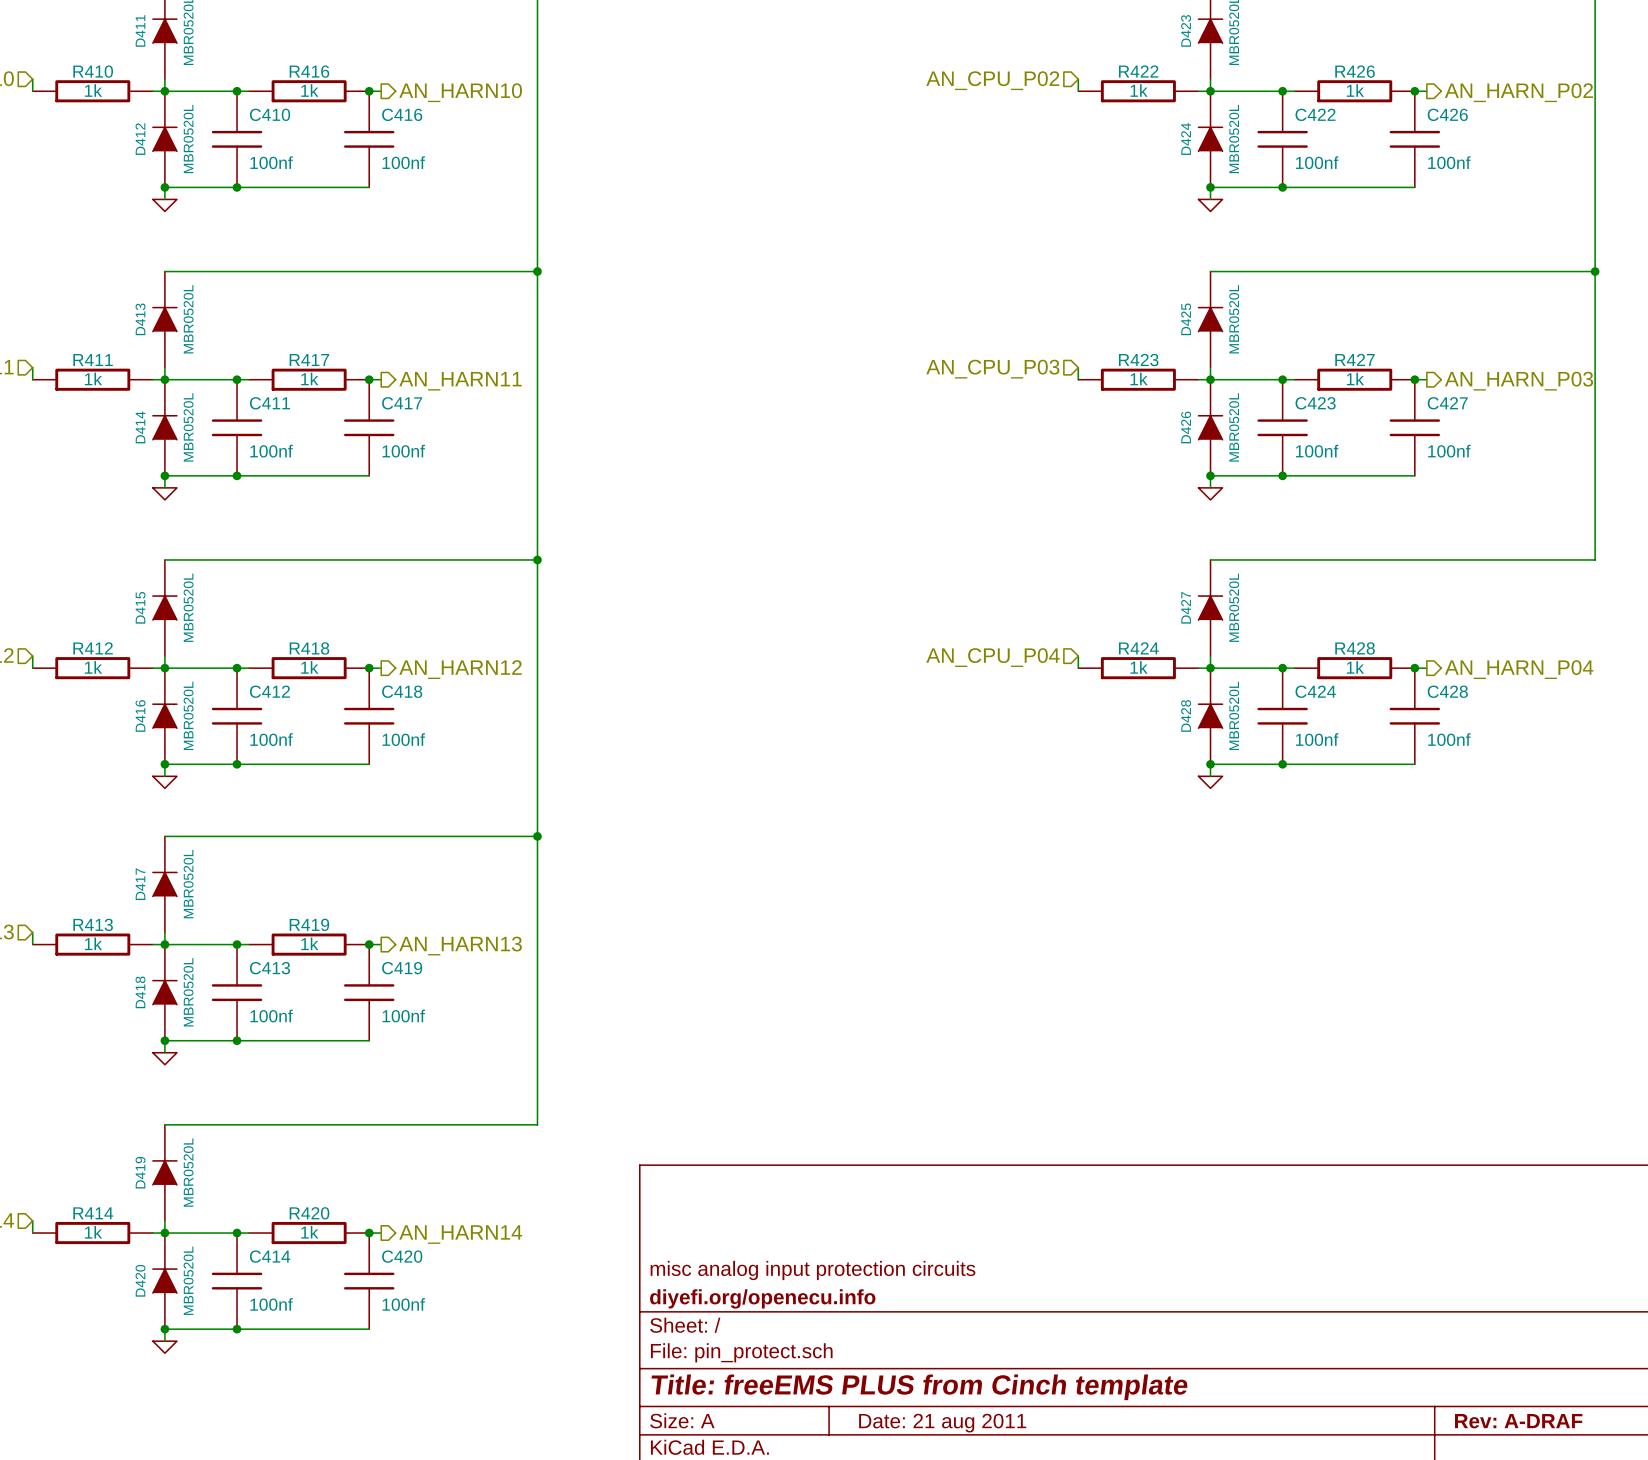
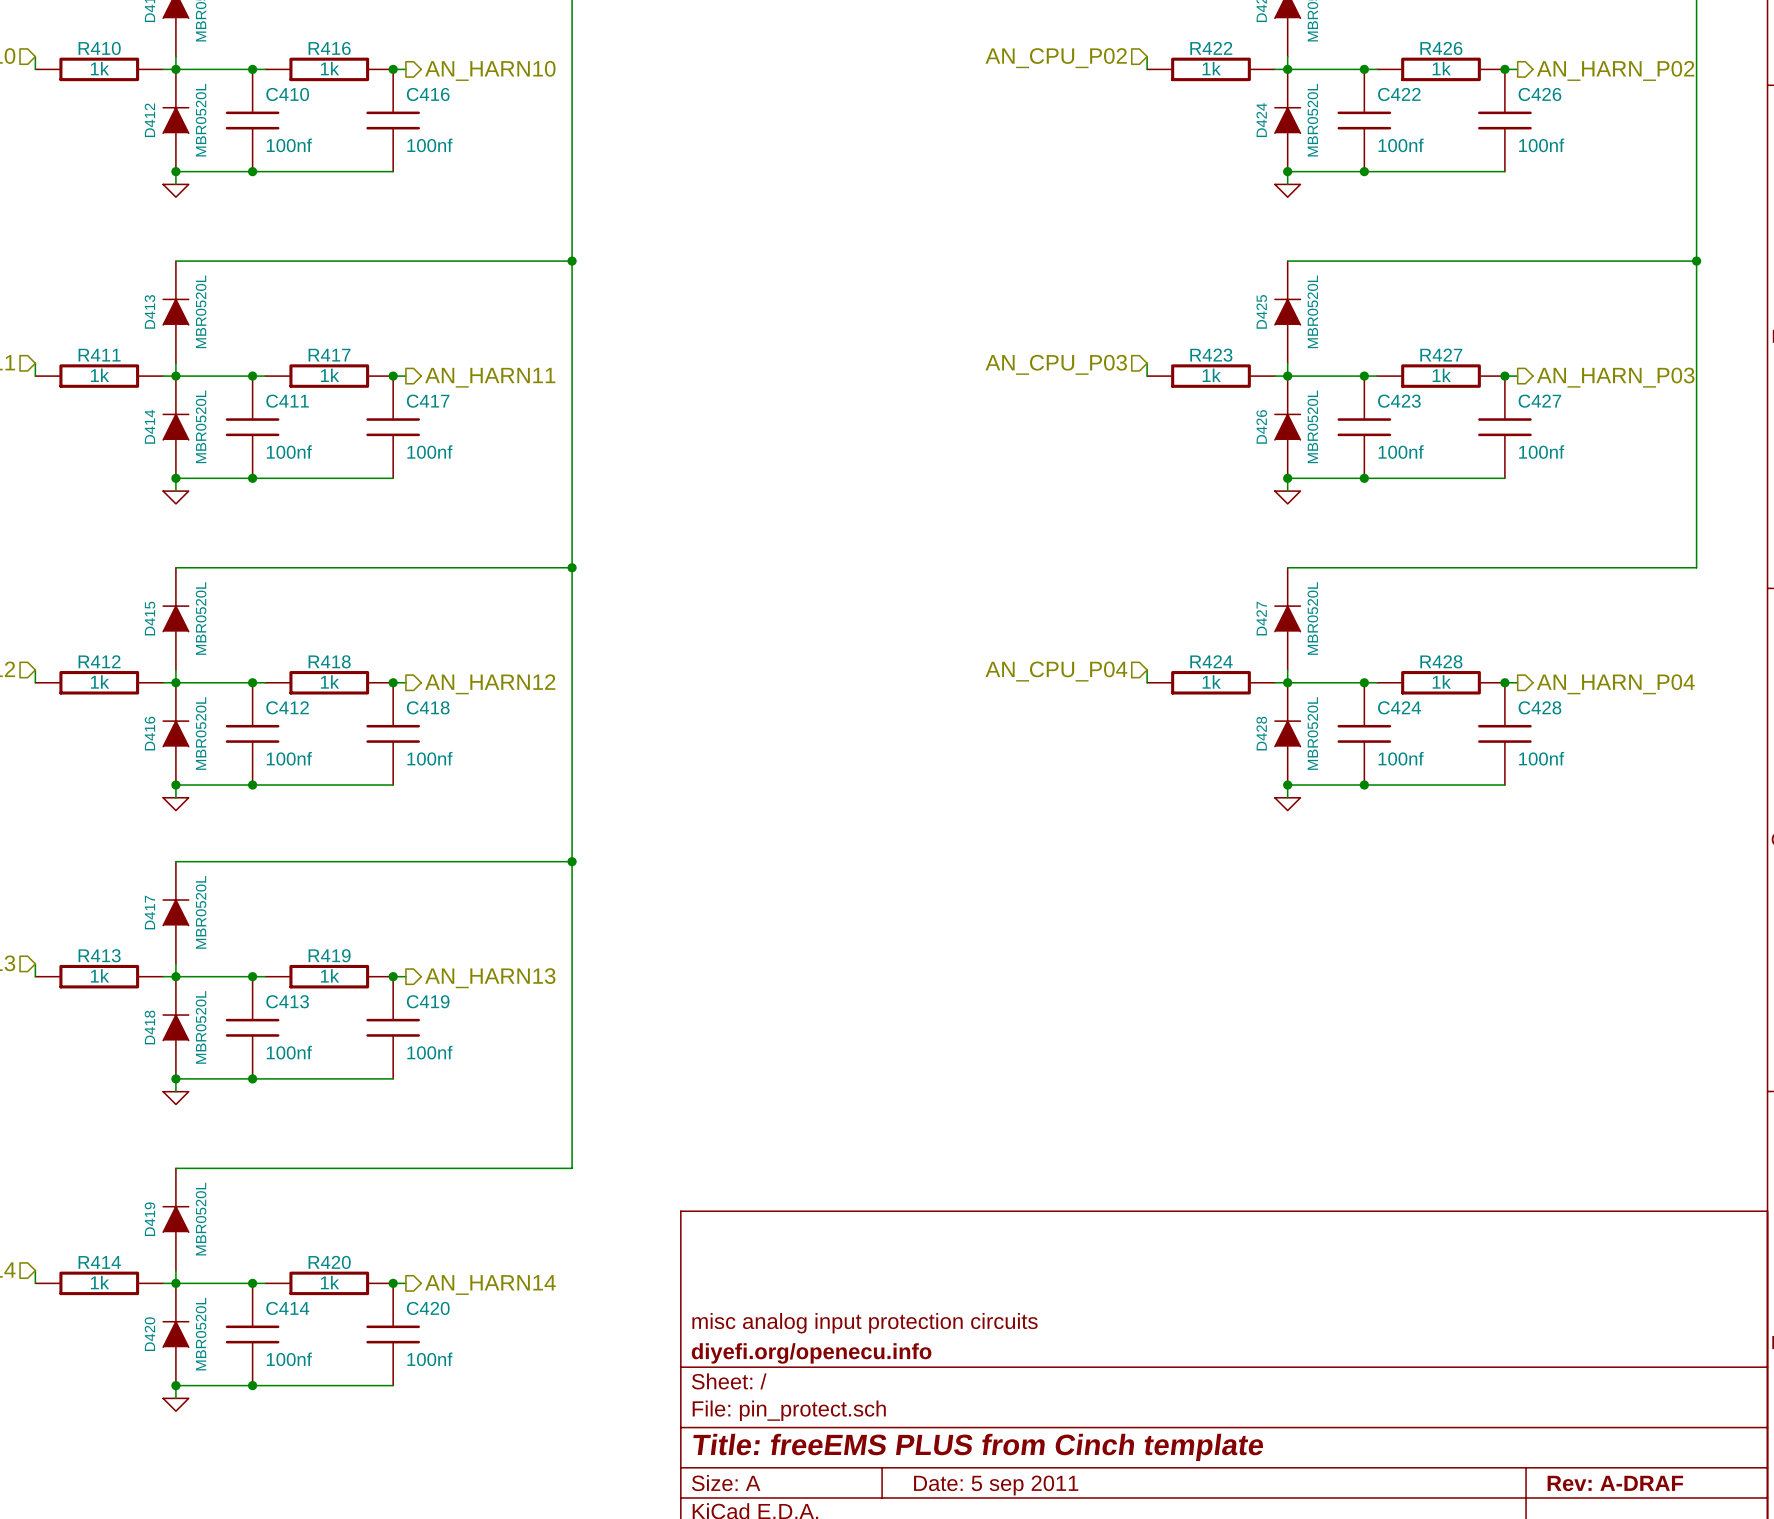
title block: Date: 21 aug 2011 (942, 1423) -> Date: 5 sep 2011 (996, 1485)

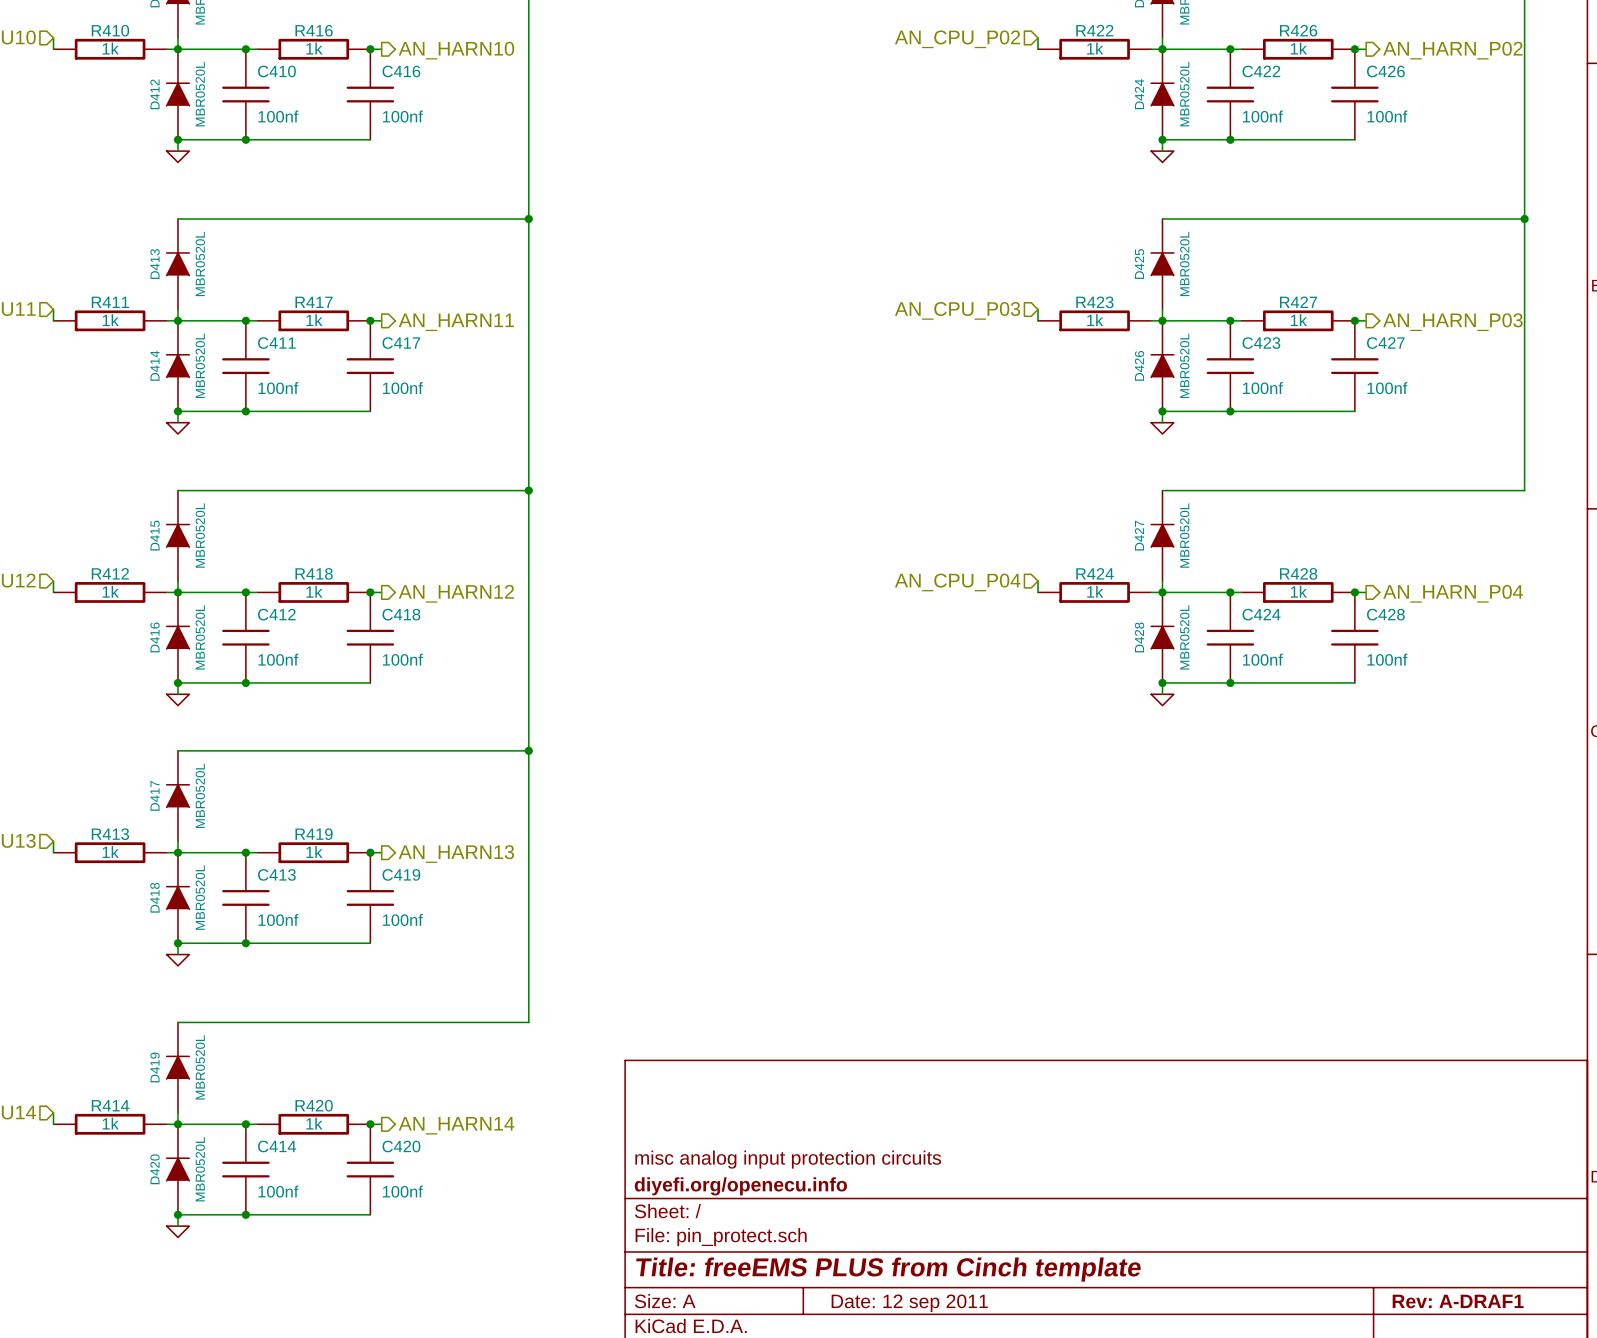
title block: Rev: A-DRAF (1615, 1483) -> Rev: A-DRAF1 (1458, 1301)
title block: Date: 5 sep 2011 (996, 1485) -> Date: 12 sep 2011 (909, 1303)

